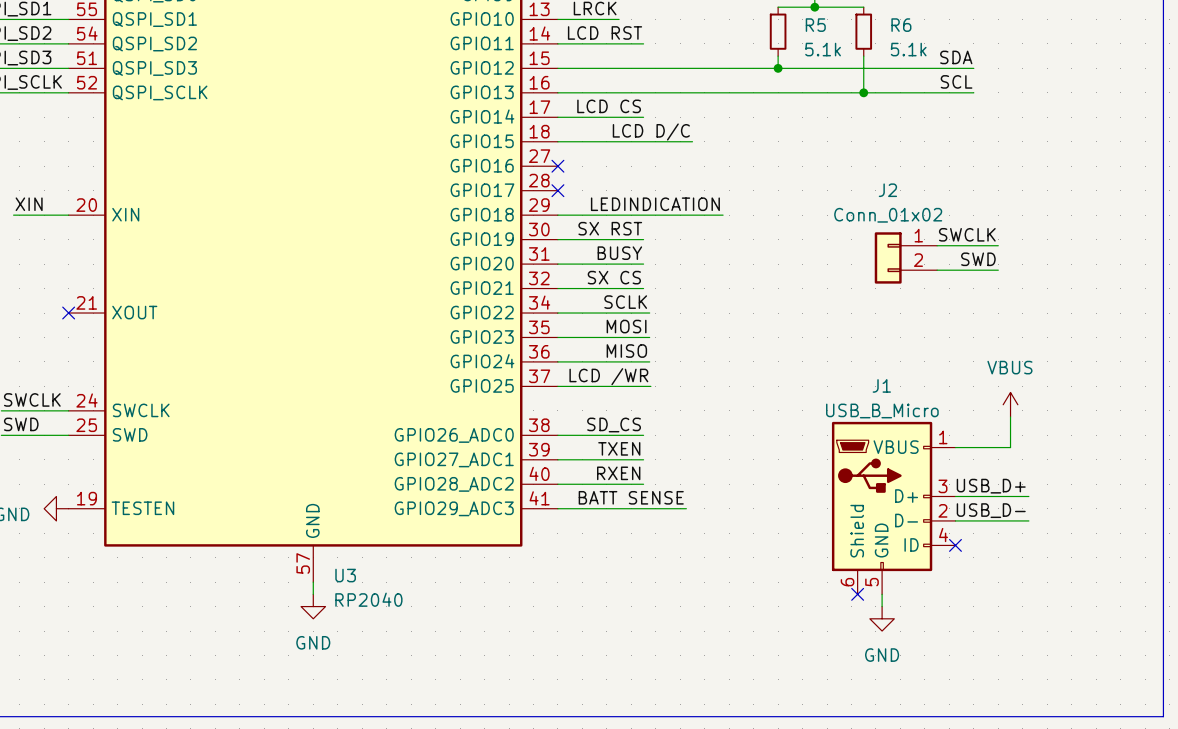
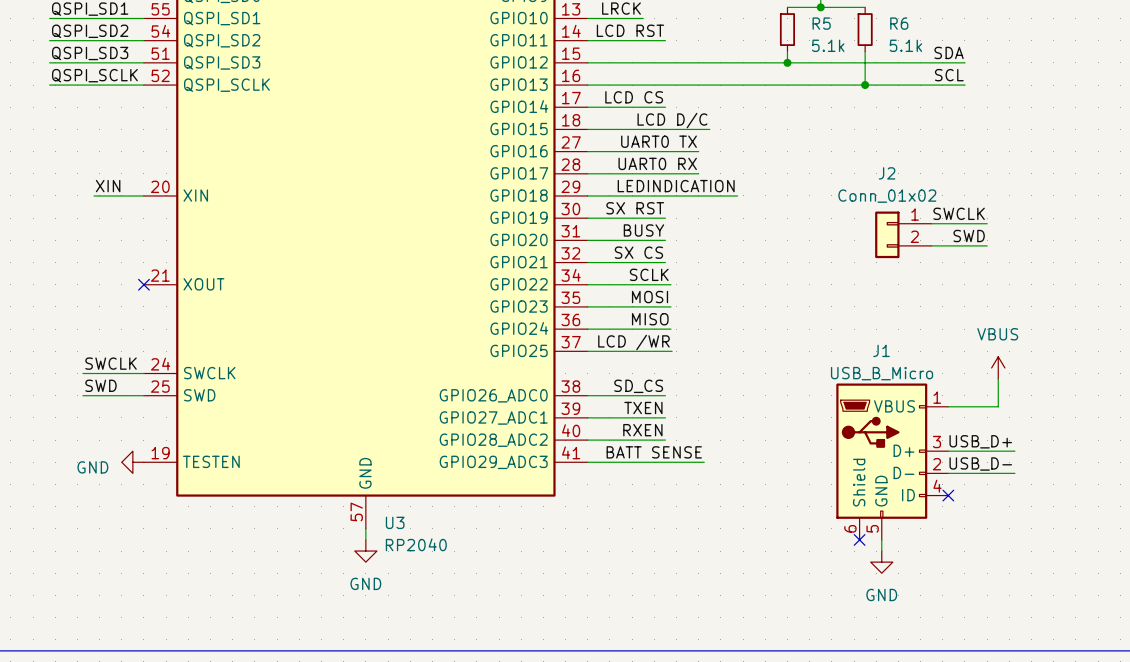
label: none -> UART0 TX (659, 141)
wire: none -> (587, 151) (698, 151)
no-connect mark: (557, 166) -> none
label: none -> UART0 RX (657, 163)
wire: none -> (587, 173) (698, 173)
no-connect mark: (557, 190) -> none

